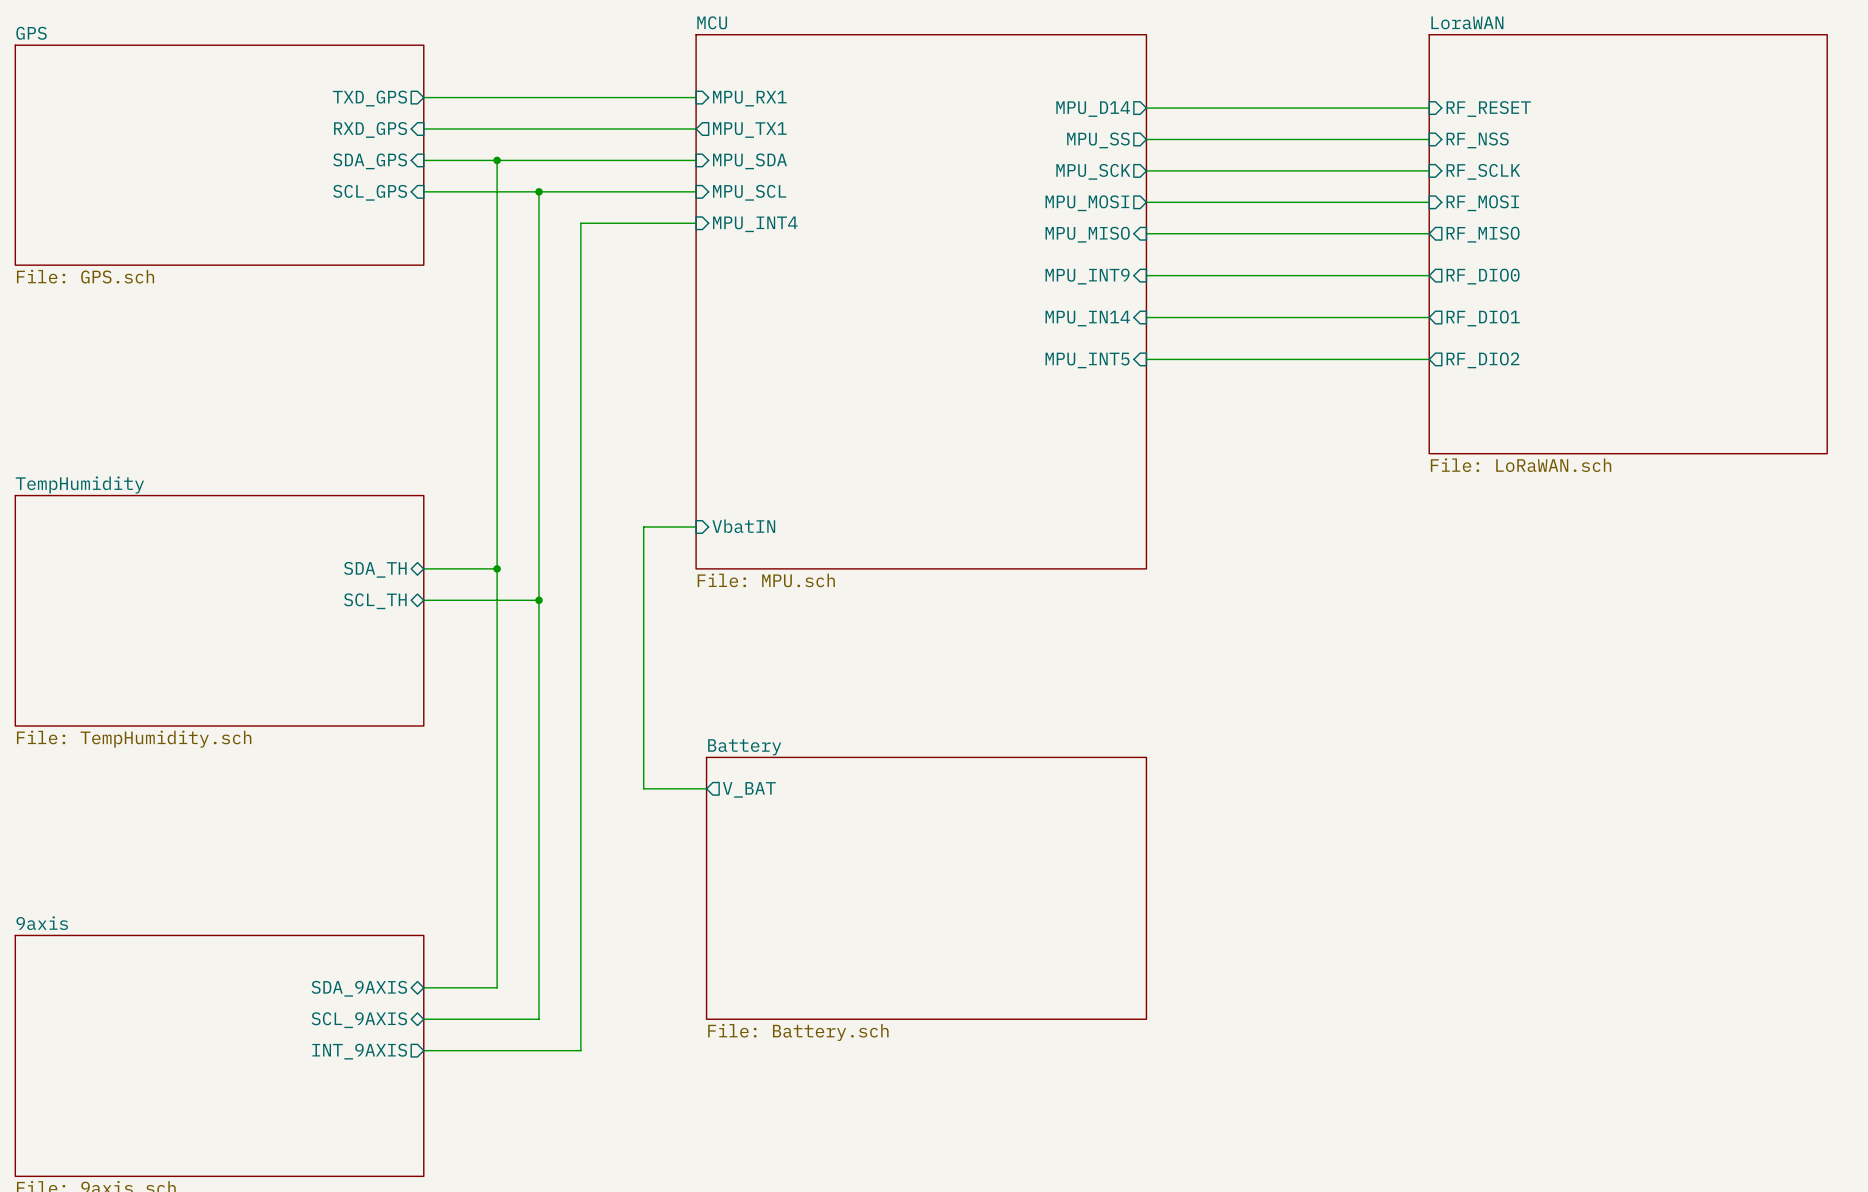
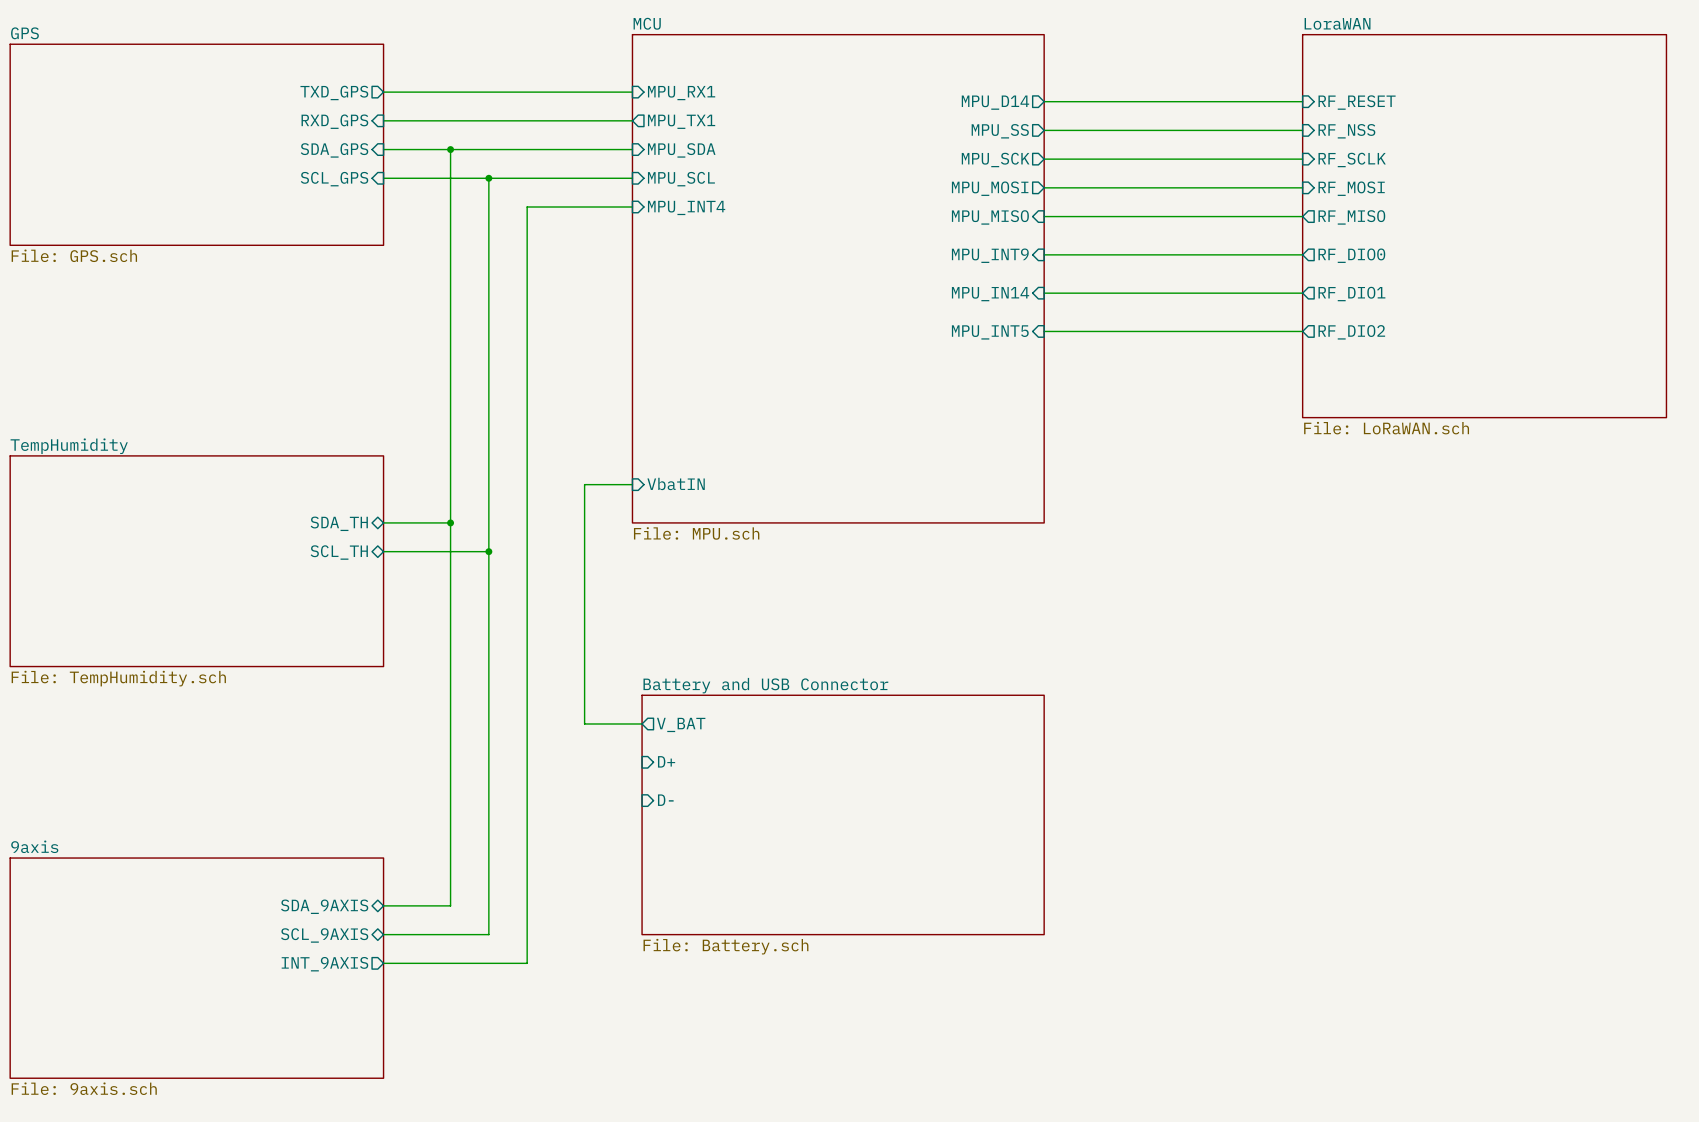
sheet Battery name: Battery (744, 747) -> Battery and USB Connector (765, 685)
sheet pin: none -> D+ (666, 761)
sheet pin: none -> D- (665, 800)

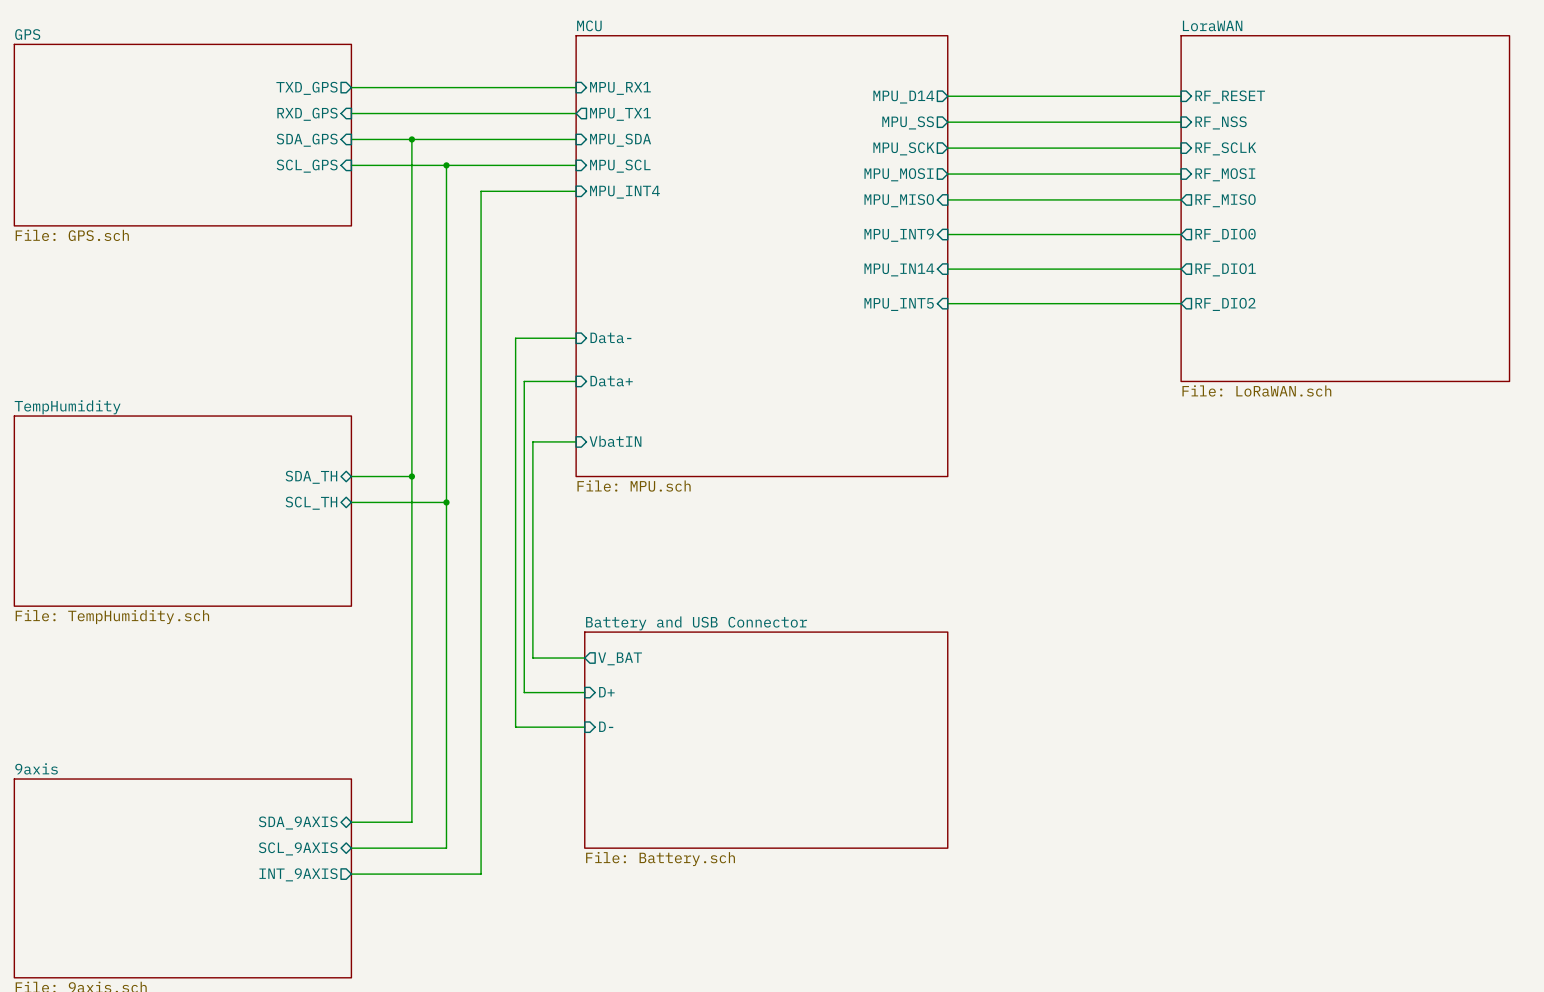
wire: none -> (576, 338) (515, 338) (515, 727) (584, 727)
sheet pin: none -> Data- (610, 337)
wire: none -> (576, 381) (524, 381) (524, 692) (584, 692)
sheet pin: none -> Data+ (611, 381)

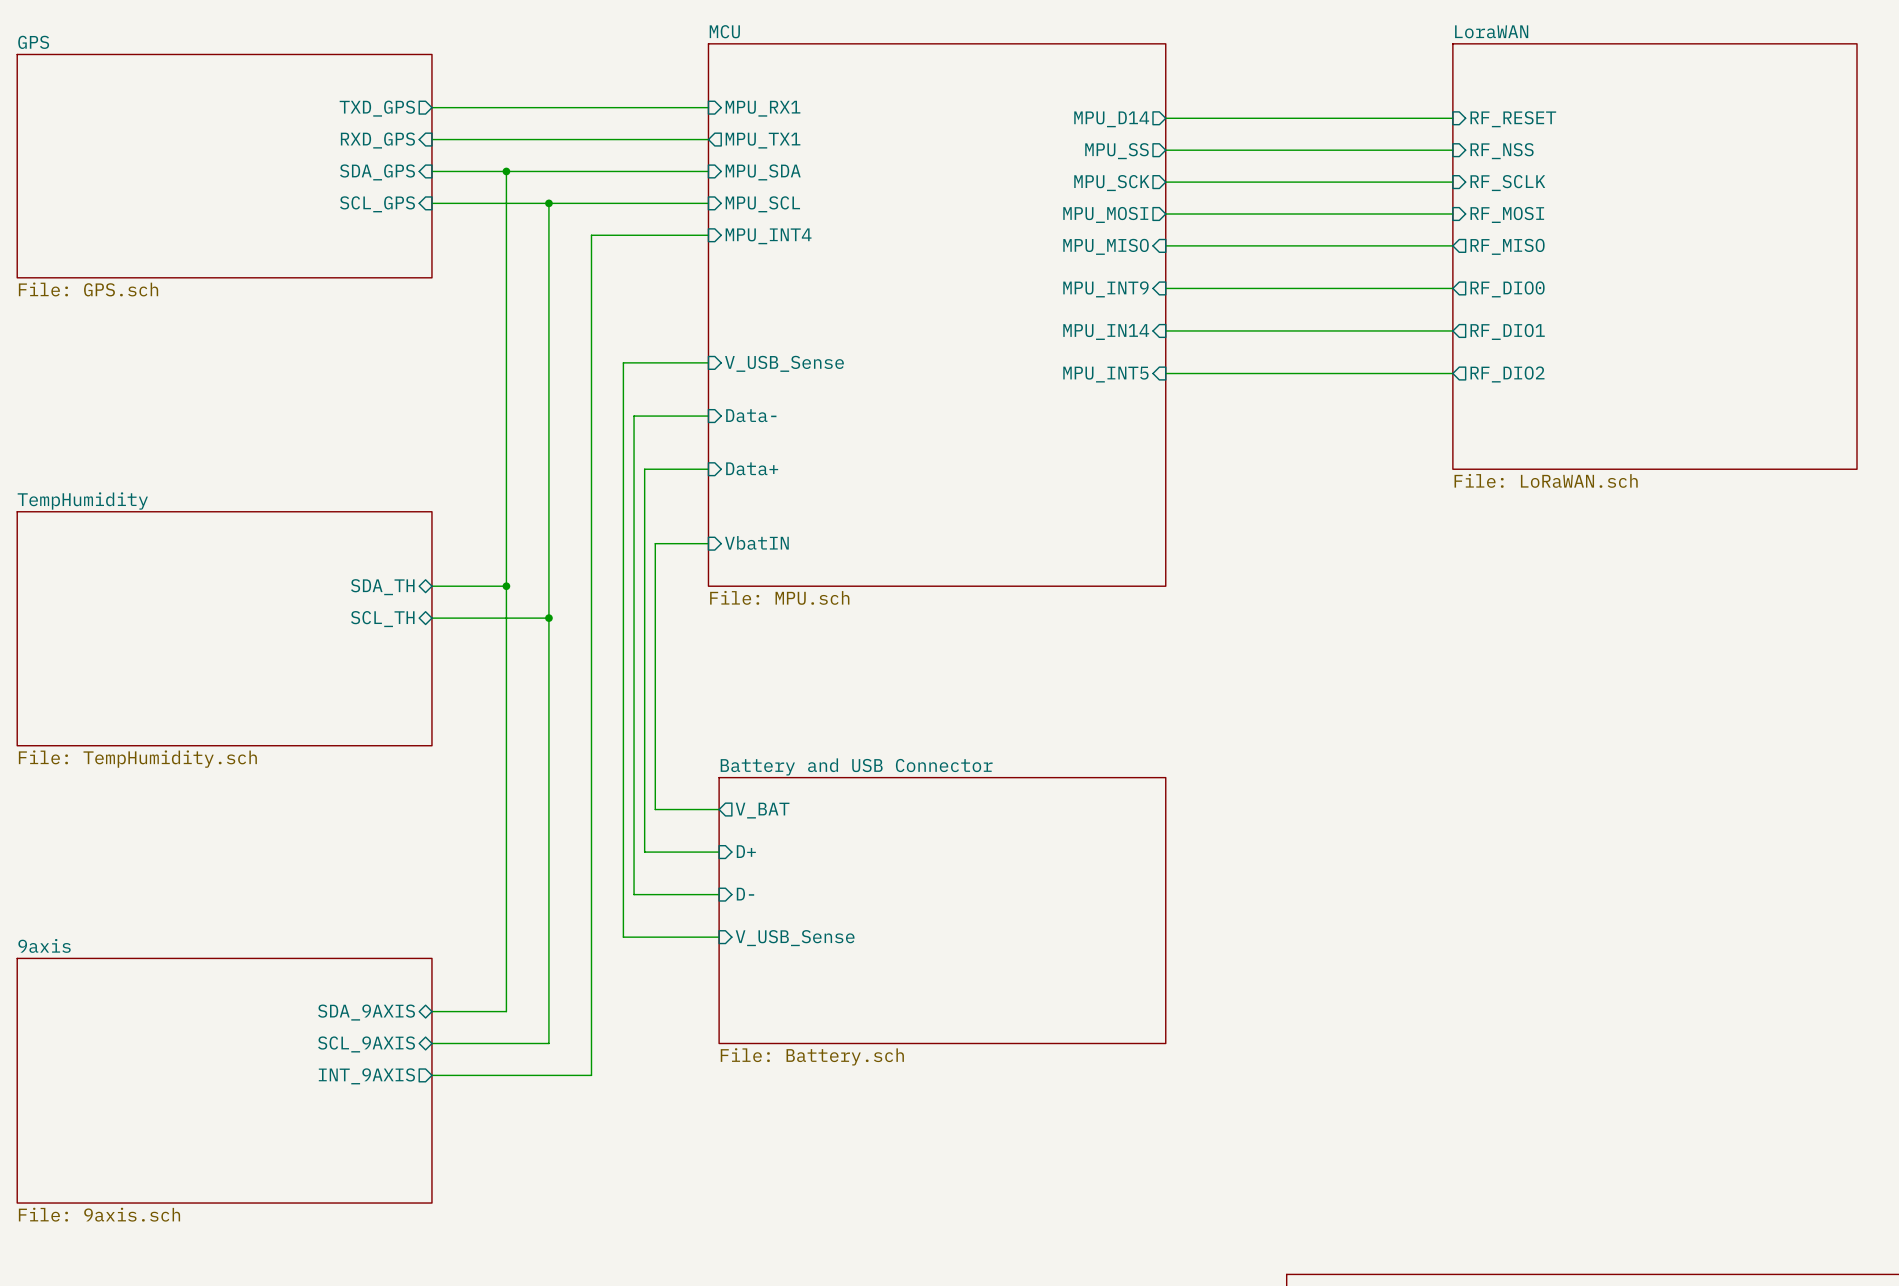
wire: none -> (708, 362) (623, 362) (623, 937) (719, 937)
sheet pin: none -> V_USB_Sense (784, 363)
sheet pin: none -> V_USB_Sense (795, 938)

